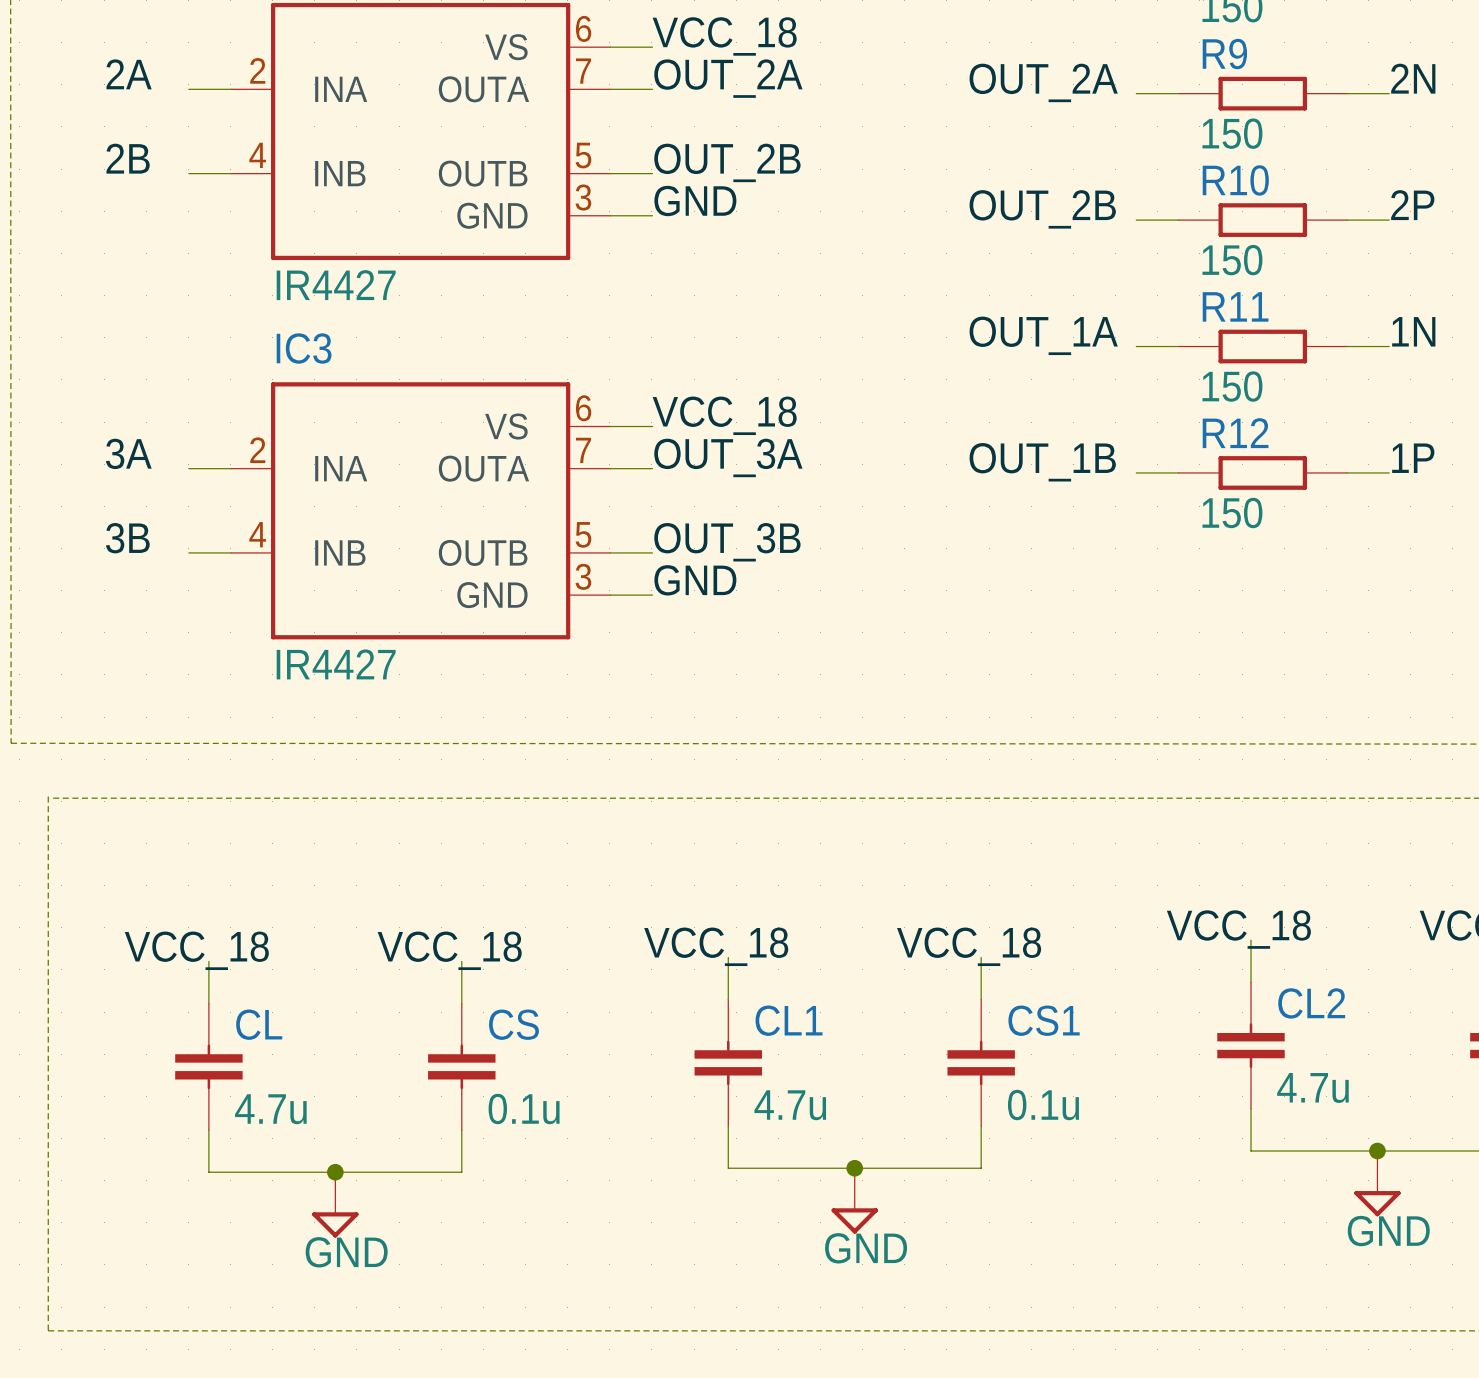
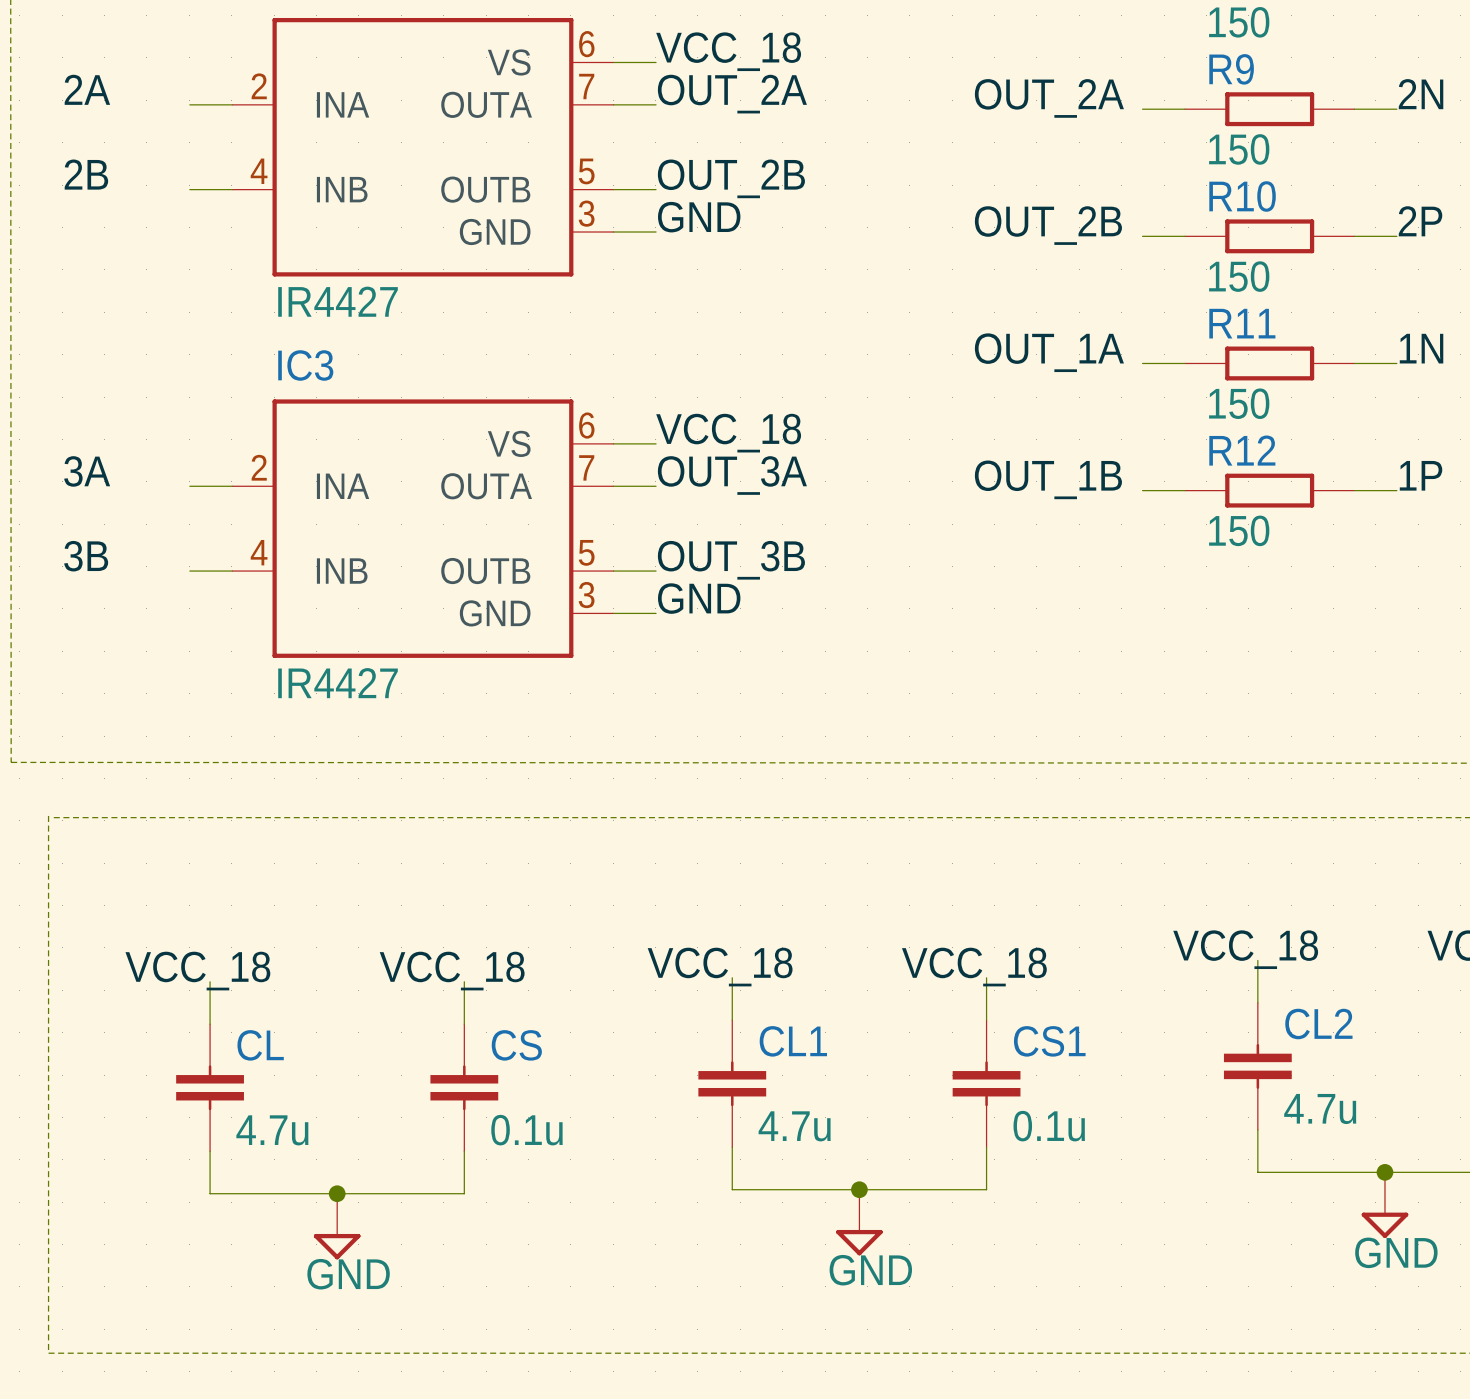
label position: 2A (129, 74) -> 2A (87, 89)
label position: 2B (128, 158) -> 2B (86, 174)
label position: 3A (128, 453) -> 3A (87, 471)
label position: 3B (127, 538) -> 3B (86, 556)

